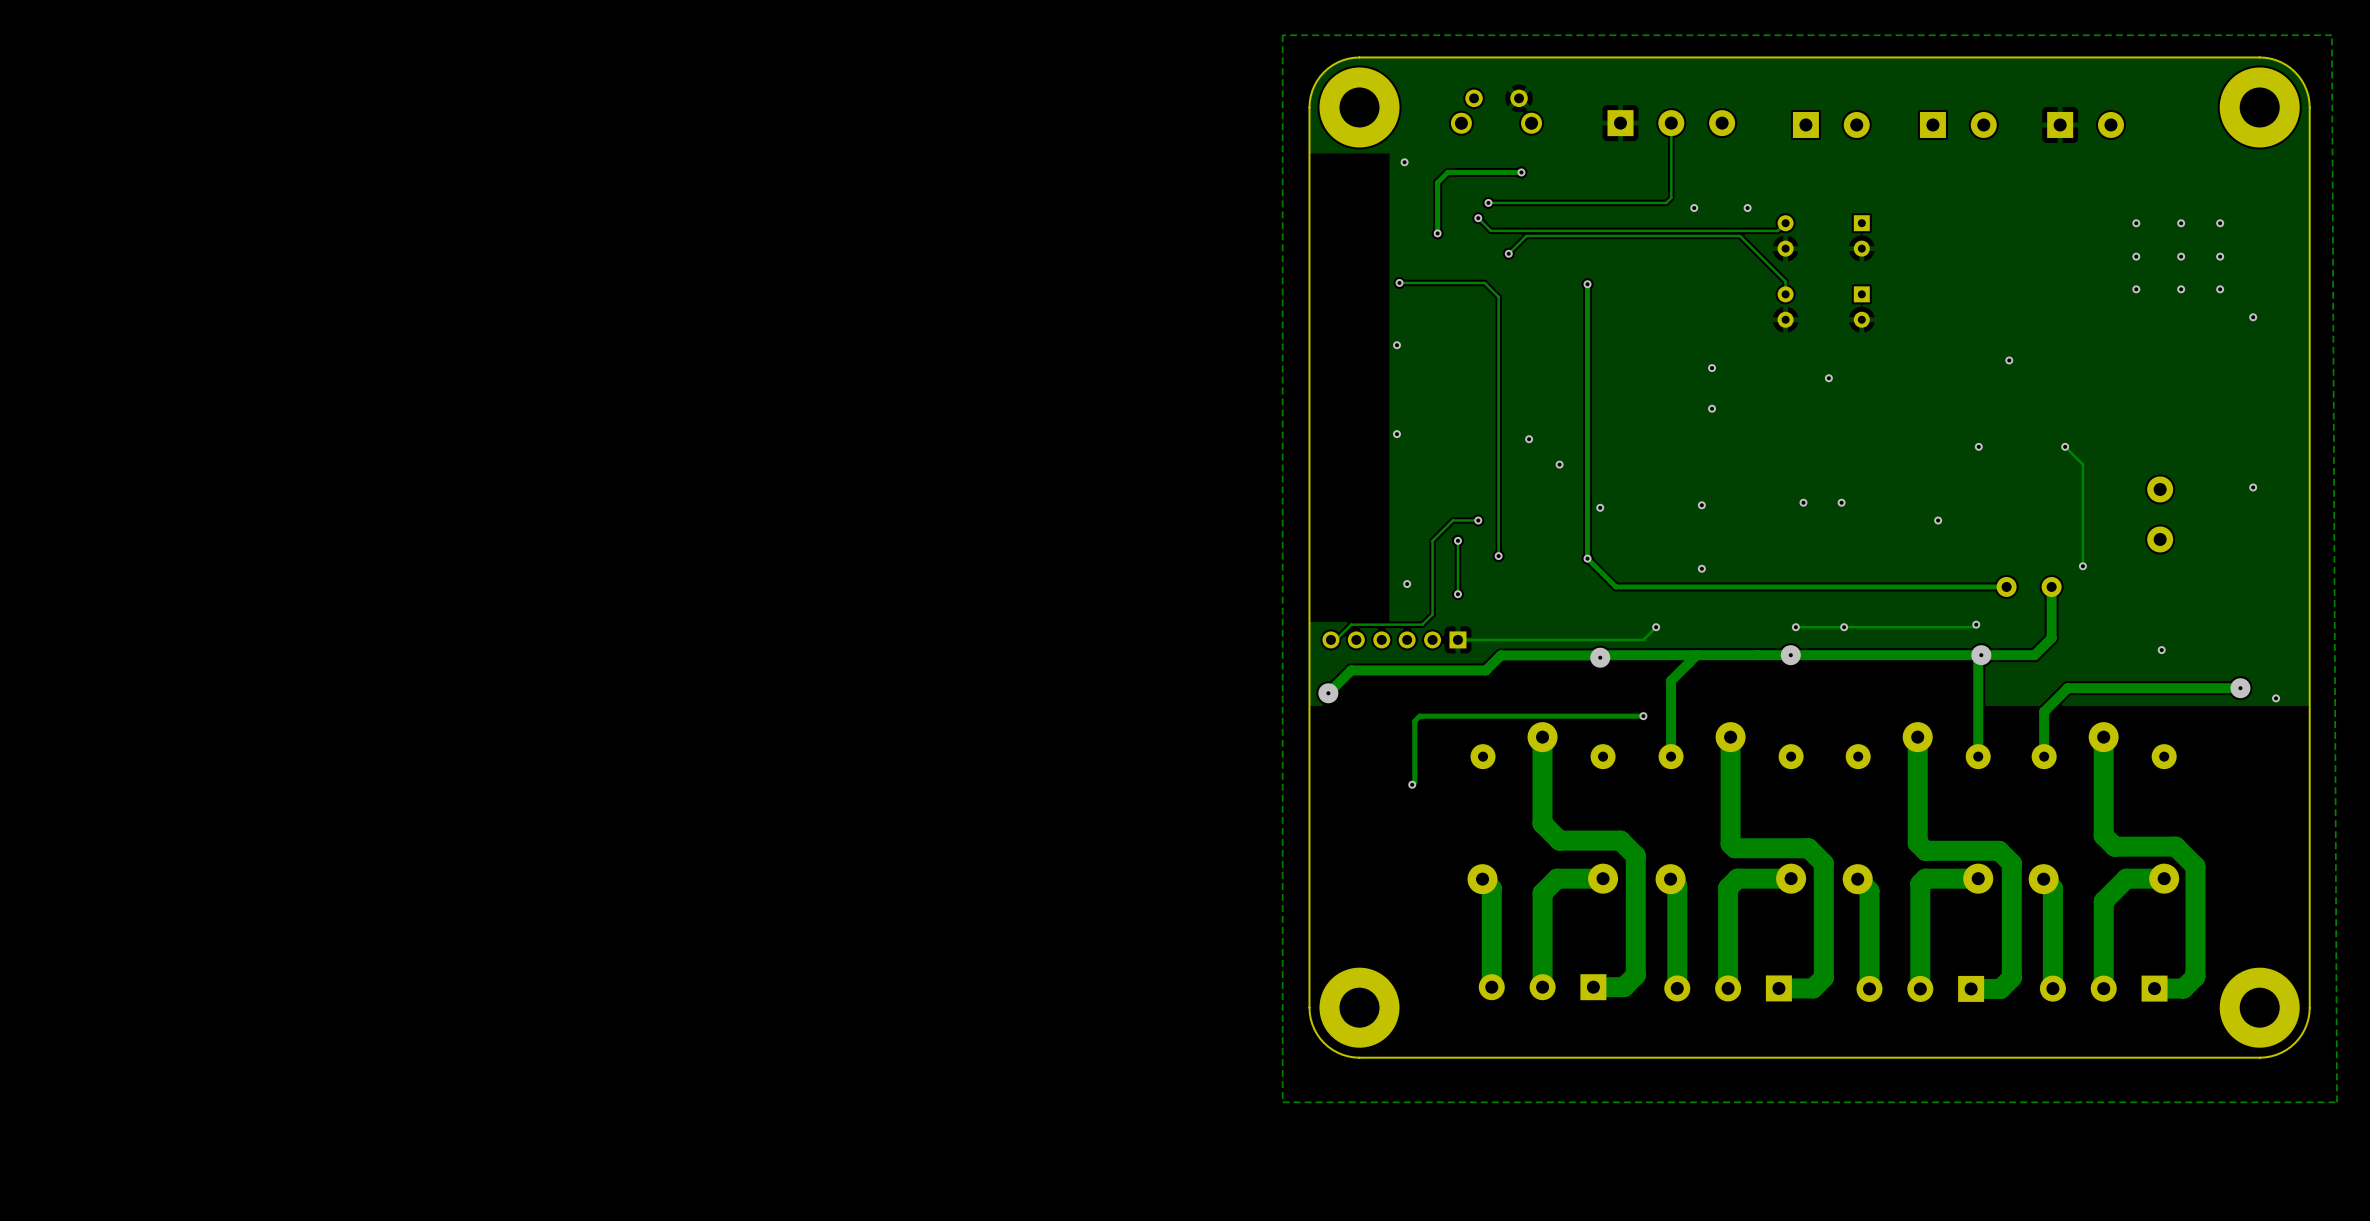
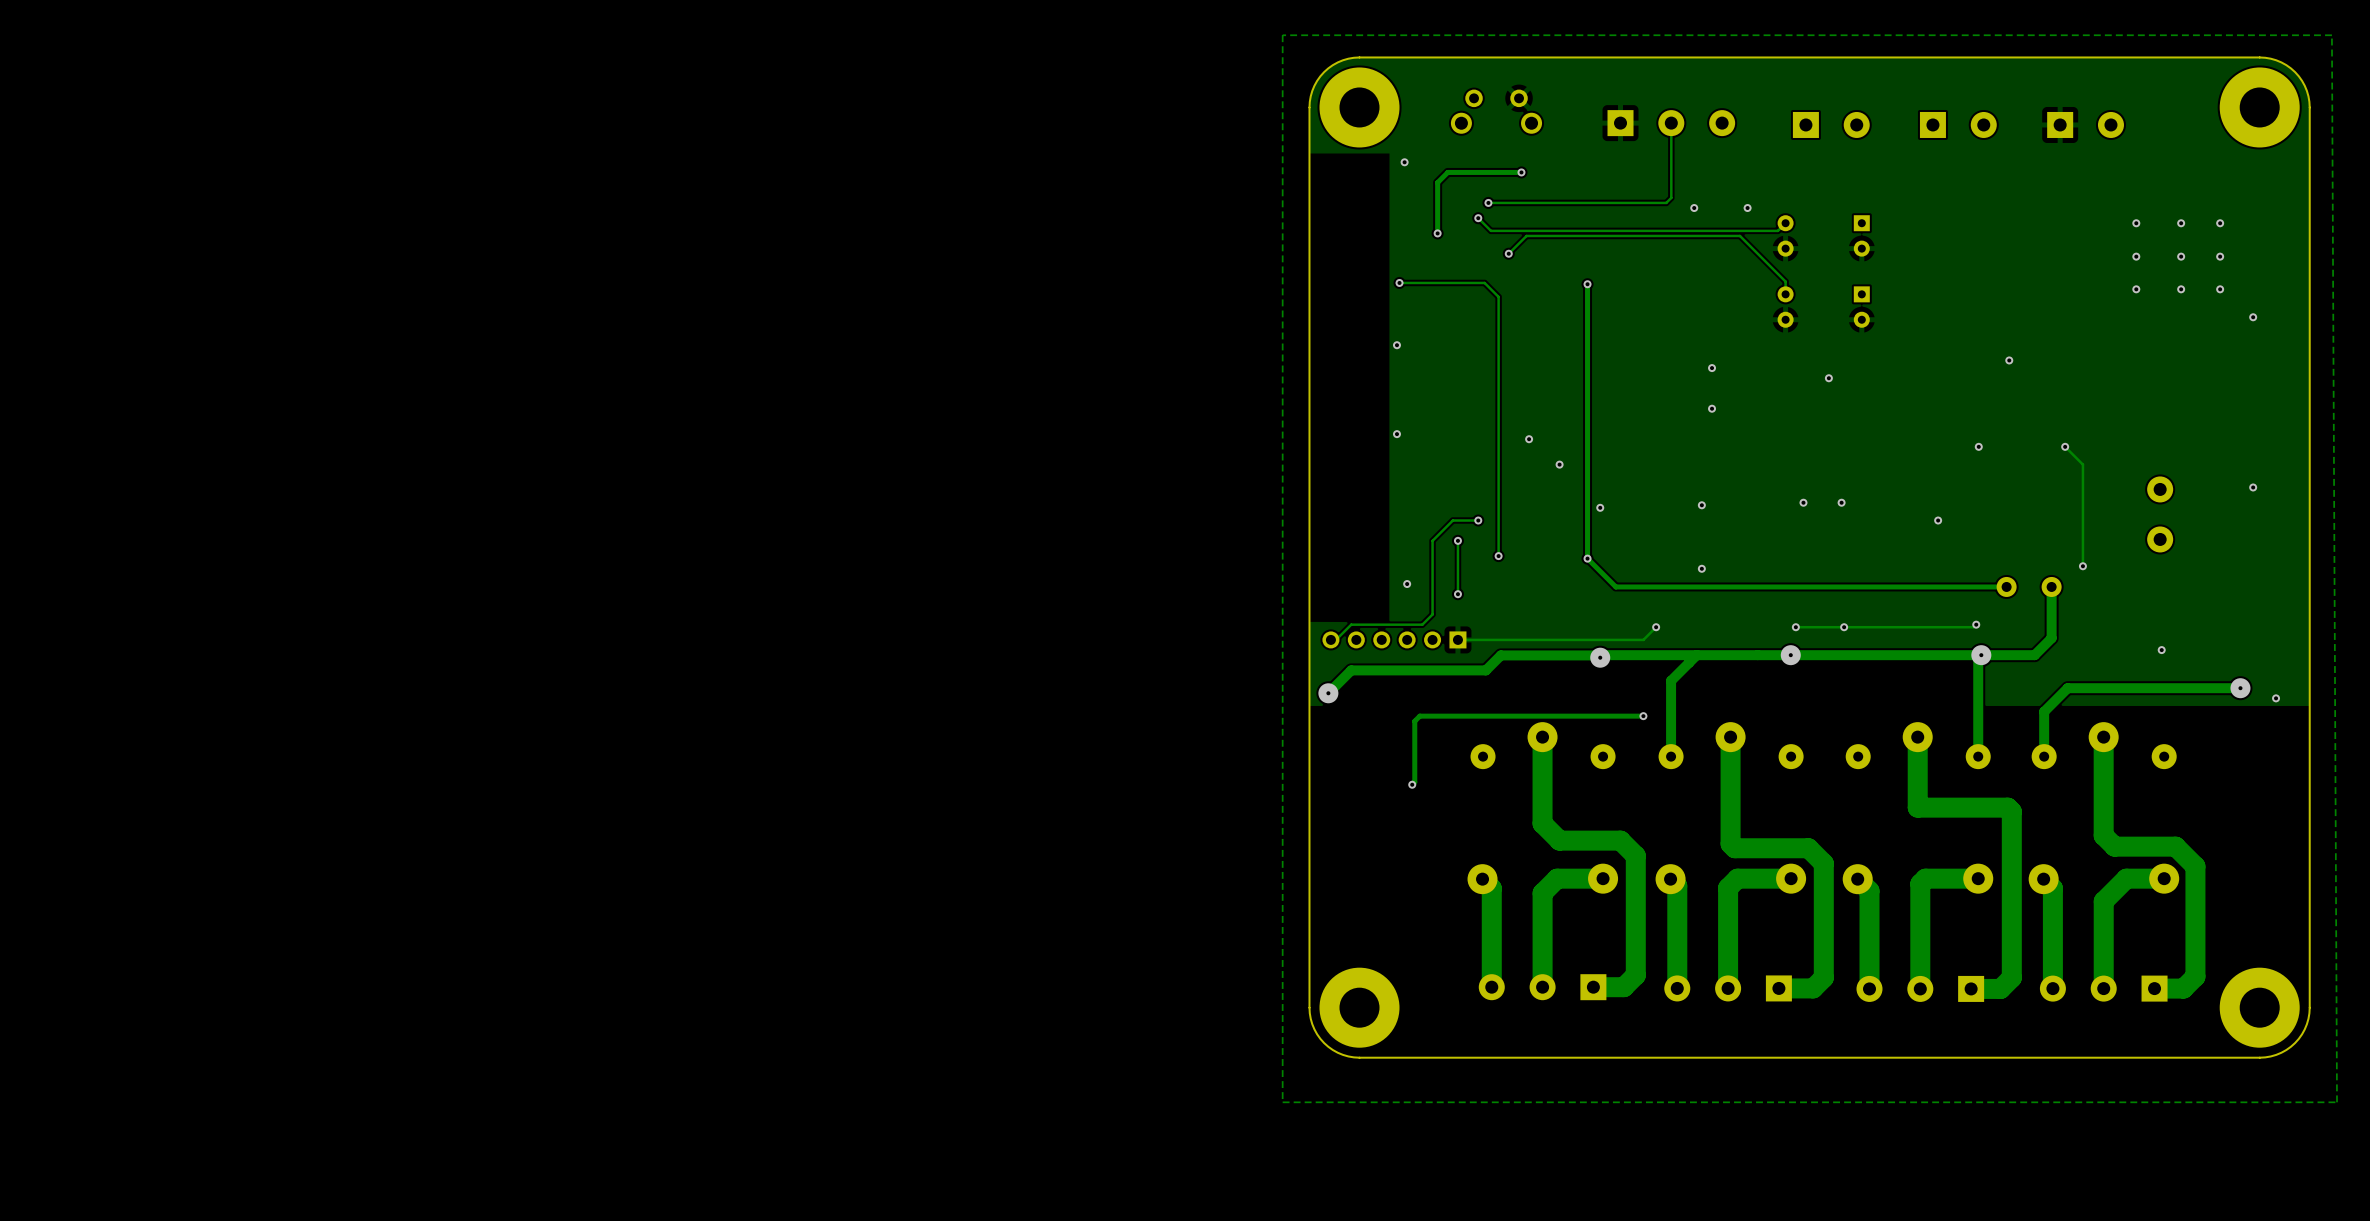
track: (1917, 807) (1917, 843) (1925, 850) (1999, 850) (2011, 863) -> (1917, 807) (2007, 807) (2011, 811) (2011, 863)

